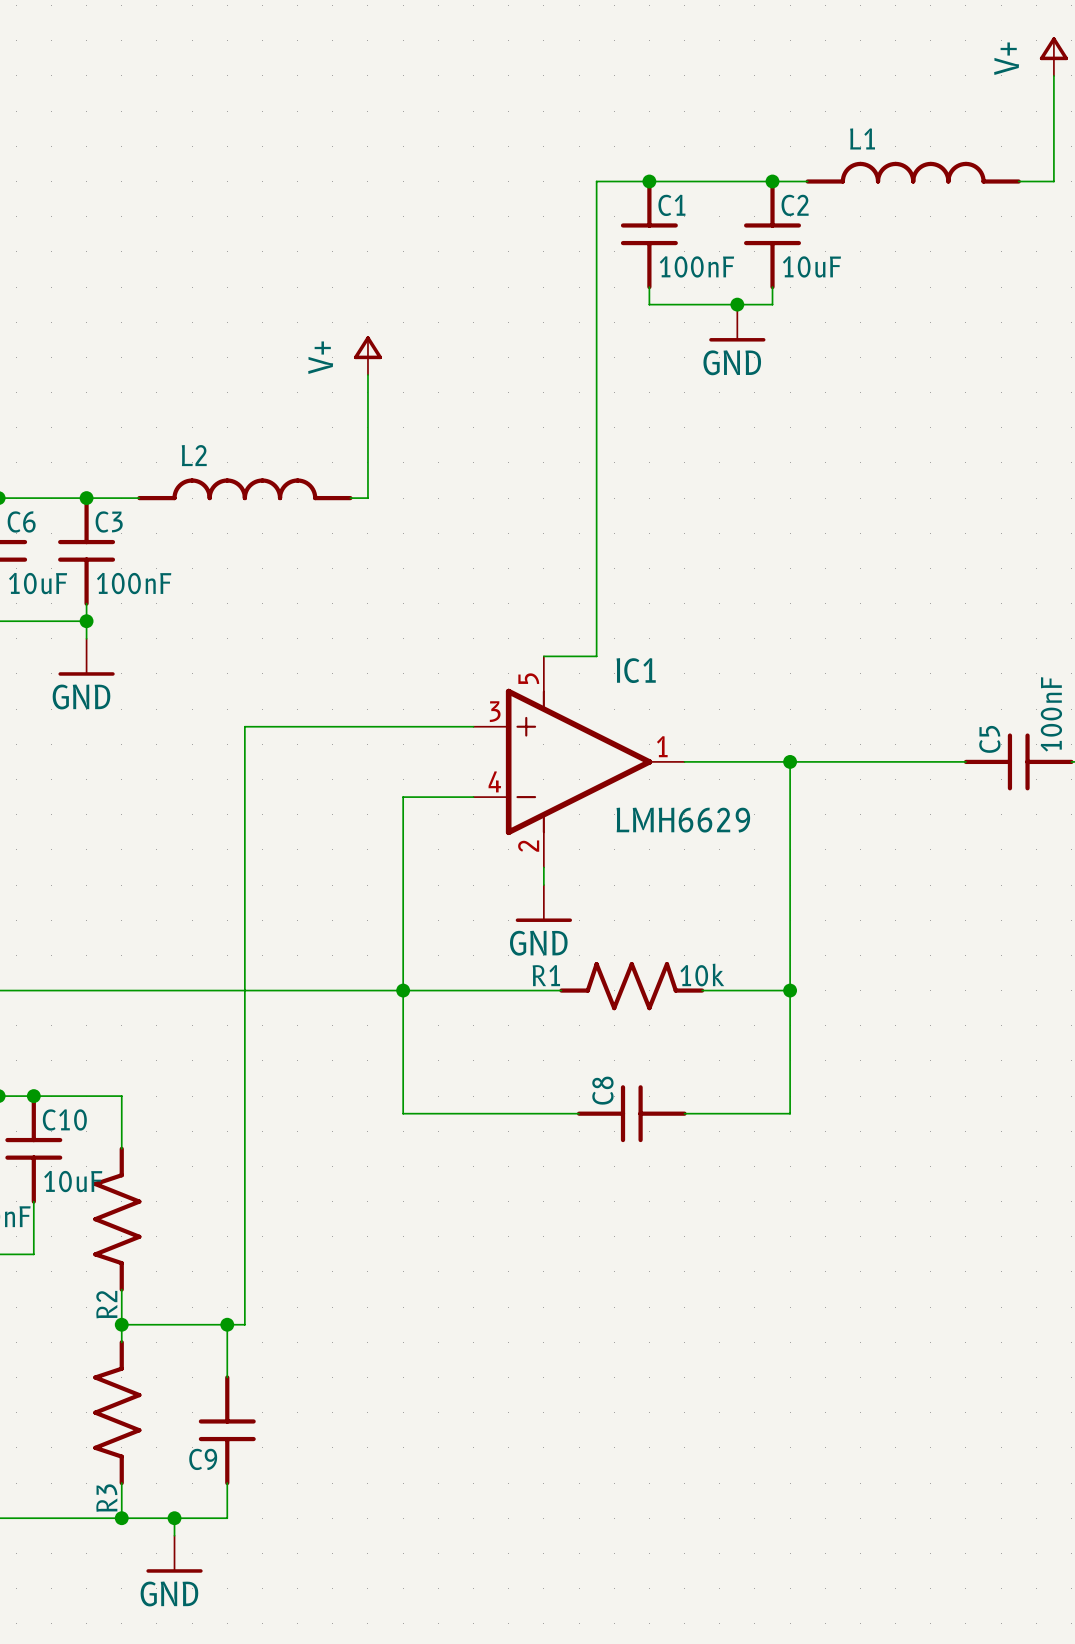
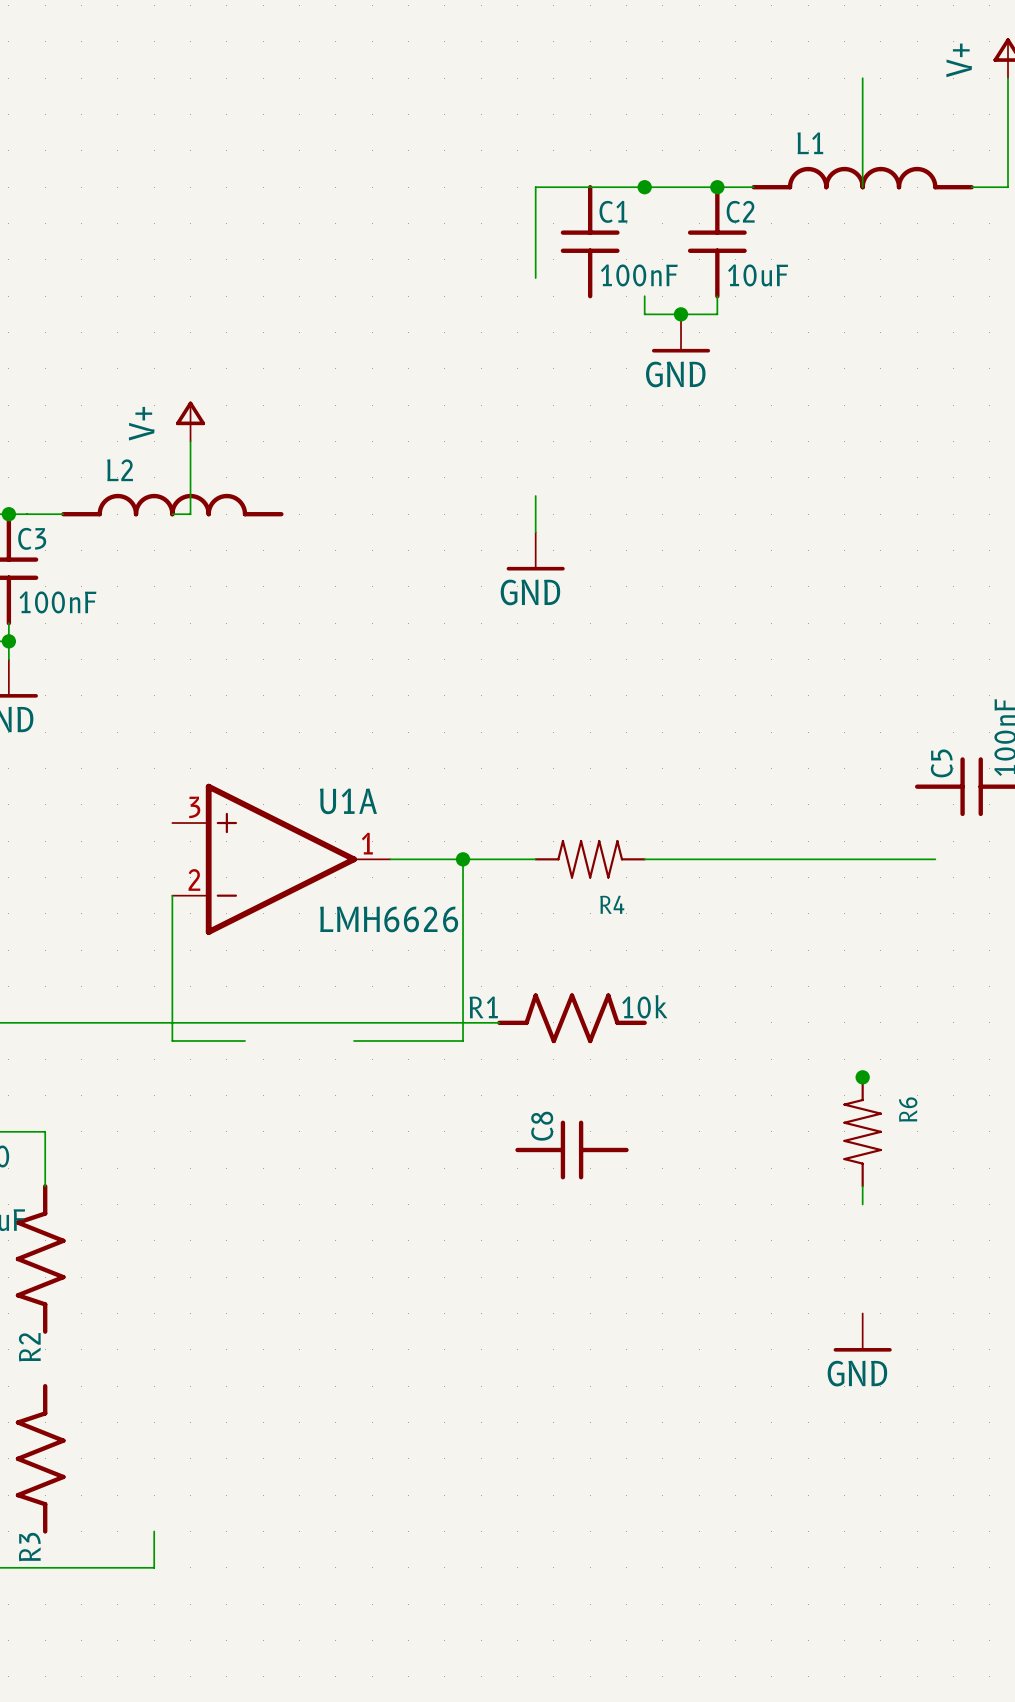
wire: none -> (862, 78) (862, 187)
junction position: (649, 181) -> (644, 187)
wire: (596, 269) (596, 480) -> none
wire: (649, 287) (649, 304) (702, 304) -> (644, 296) (644, 314)
power symbol position: V+ (367, 355) -> V+ (190, 421)
wire: (367, 374) (367, 498) (350, 498) -> none
wire: none -> (190, 441) (190, 514) (172, 514)
wire: (596, 515) (596, 656) (543, 656) -> none
power symbol: none -> GND (535, 551)
wire: (473, 726) (244, 726) (244, 867) -> none
IC1: LMH6629 (579, 761) -> none
wire: (684, 761) (965, 761) -> (644, 859) (935, 859)
wire: (790, 761) (790, 1113) (684, 1113) -> none
junction: (790, 761) -> none
wire: (473, 797) (403, 797) (403, 1113) (579, 1113) -> none
U1A: none -> LMH6626 (281, 859)
wire: none -> (390, 859) (535, 859)
wire: none -> (463, 859) (463, 1041) (354, 1041)
junction: none -> (463, 859)
R4: none -> (590, 859)
wire: (543, 867) (543, 885) -> none
power symbol: GND (543, 903) -> none
junction: (403, 990) -> none
wire: (702, 990) (790, 990) -> none
junction: (790, 990) -> none
wire: (244, 1008) (244, 1324) (121, 1324) -> (172, 1041) (245, 1041)
junction: none -> (862, 1077)
R6: none -> (862, 1131)
wire: none -> (862, 1186) (862, 1204)
wire: (121, 1289) (121, 1342) -> none
power symbol: none -> GND (862, 1332)
junction: (121, 1324) -> none
wire: (227, 1324) (227, 1377) -> none
junction: (227, 1324) -> none
C9: (227, 1430) -> none
wire: (121, 1483) (121, 1518) -> none
junction: (121, 1518) -> none
wire: (174, 1518) (174, 1535) -> none
junction: (174, 1518) -> none
power symbol: GND (174, 1554) -> none

